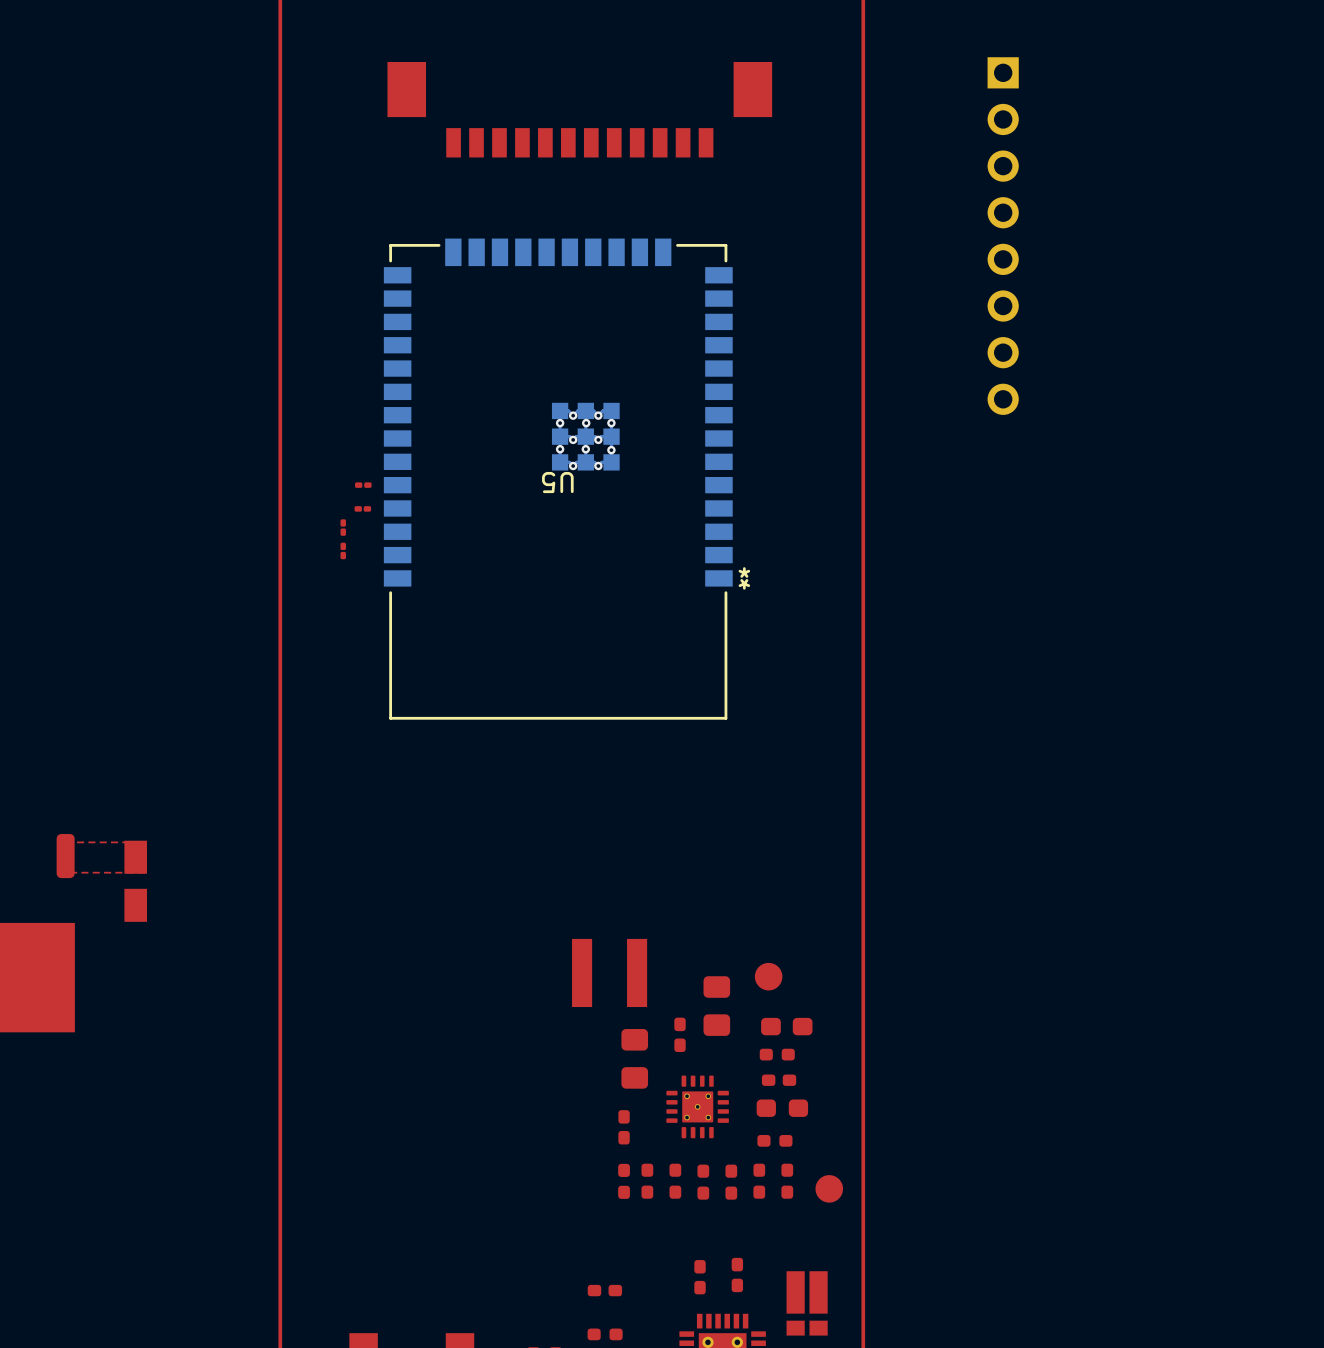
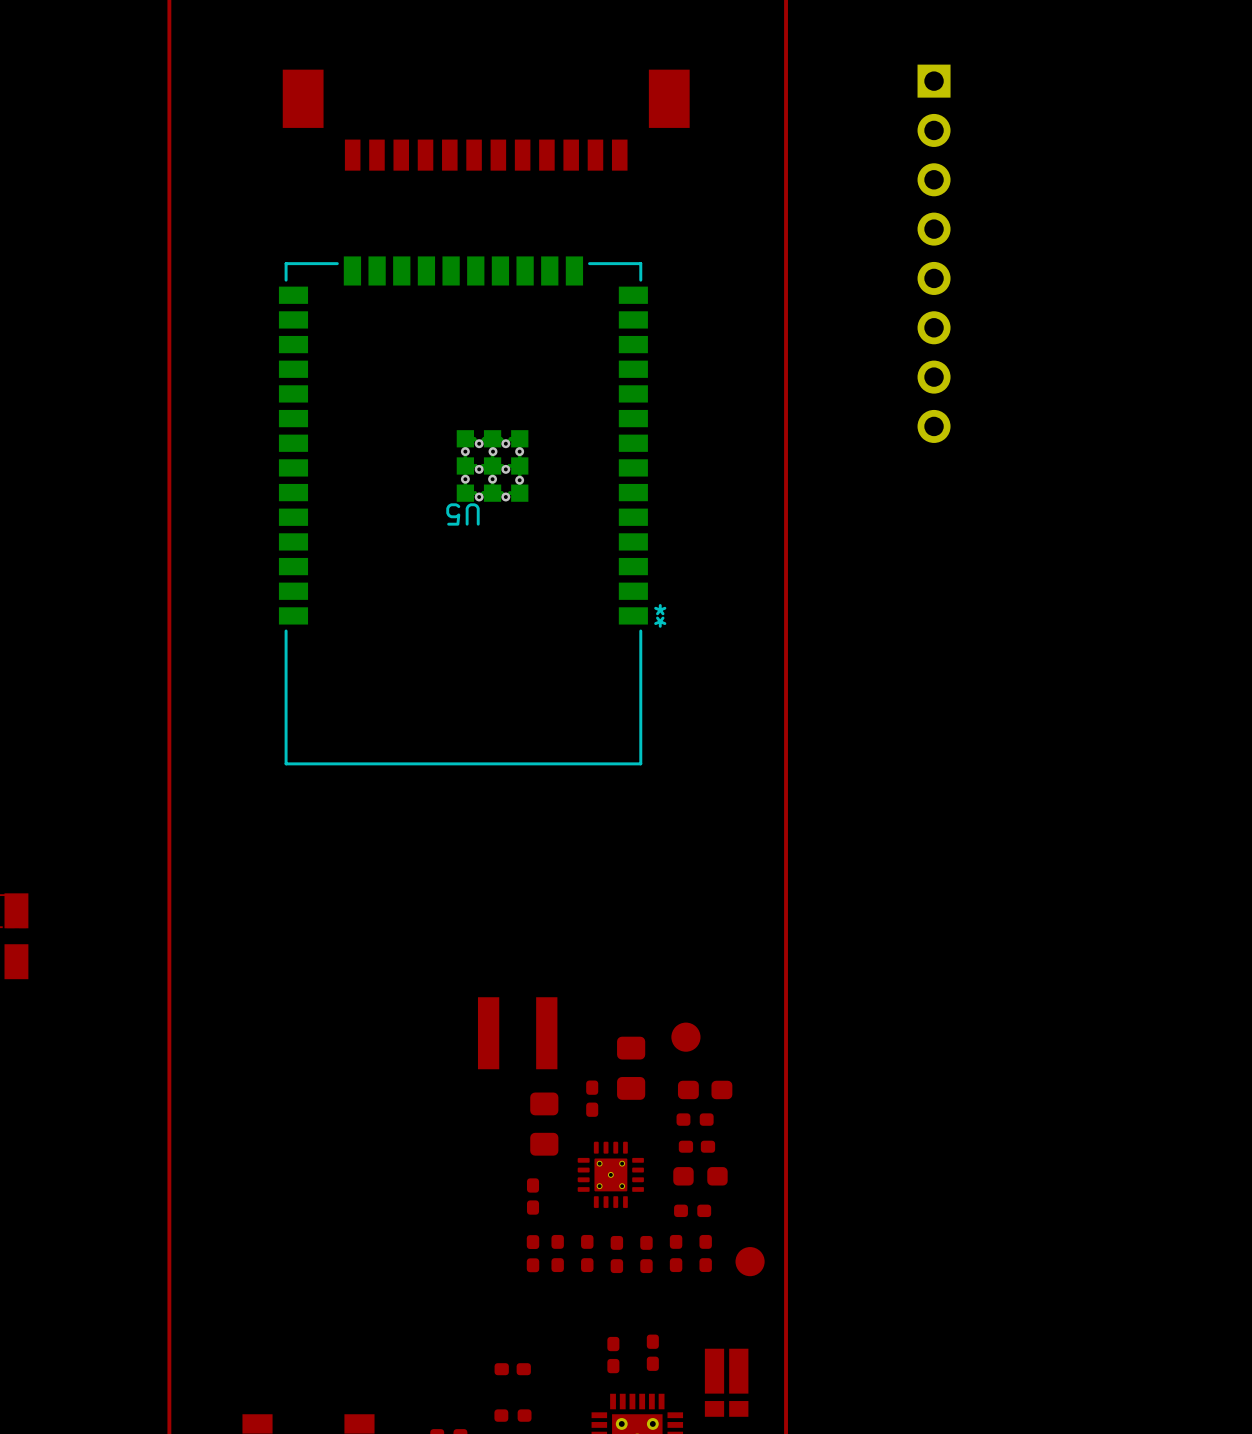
part: (363, 485) -> none
part: (362, 508) -> none
part: (343, 527) -> none
part: (343, 550) -> none

